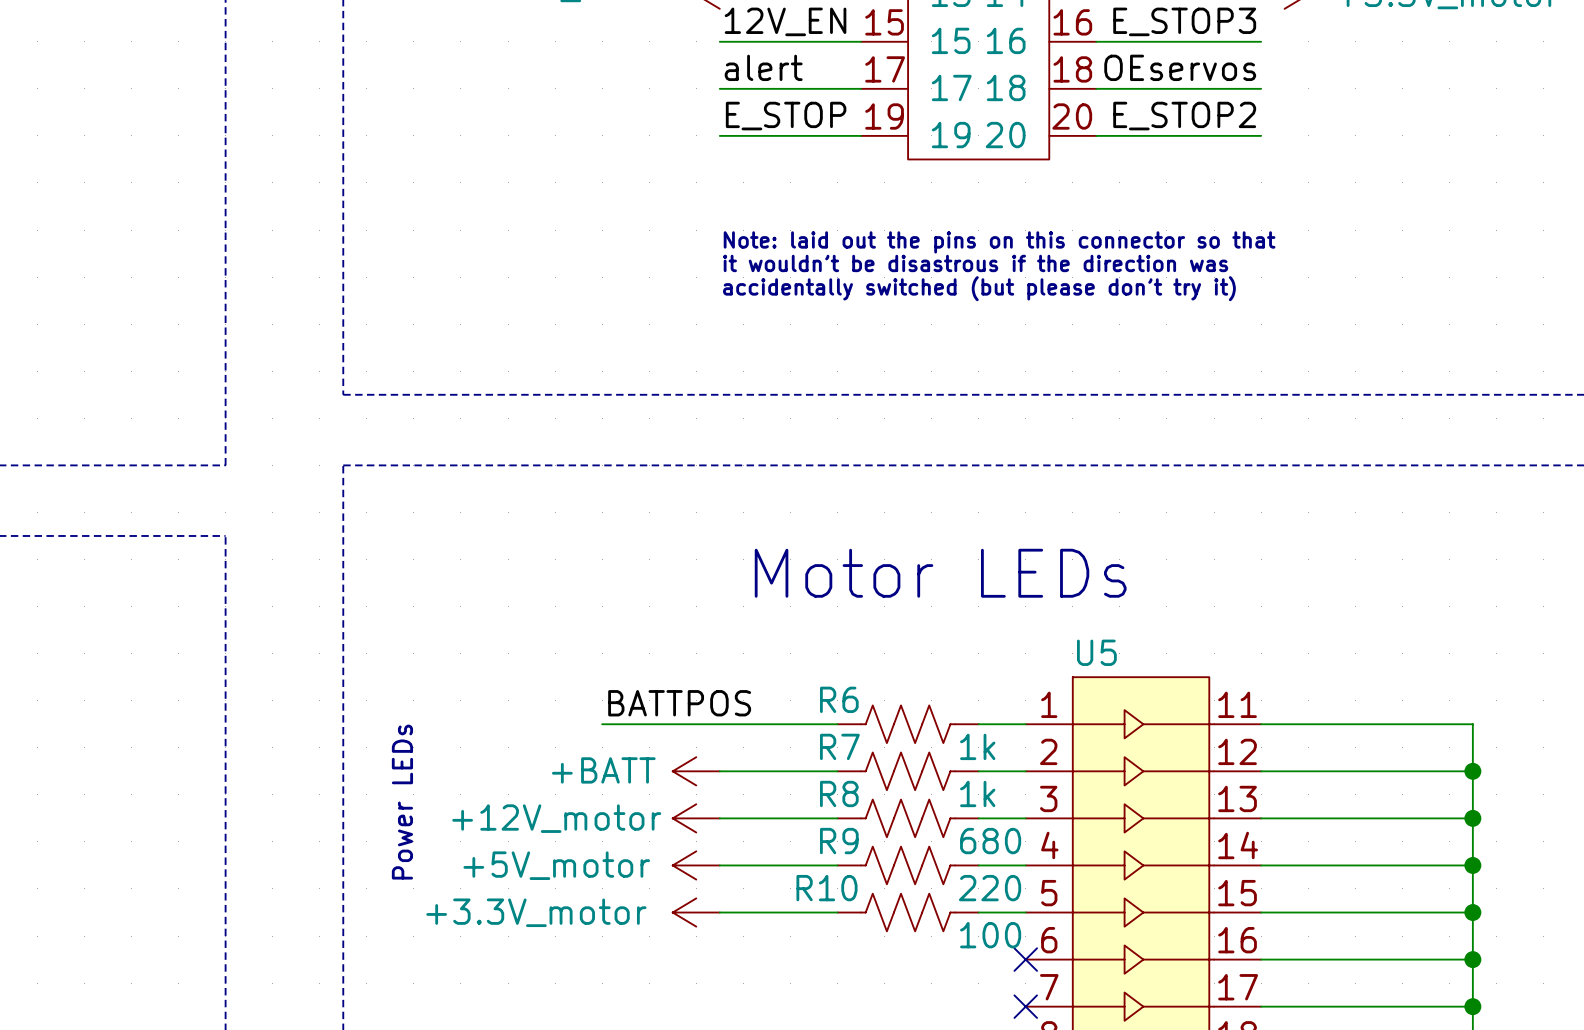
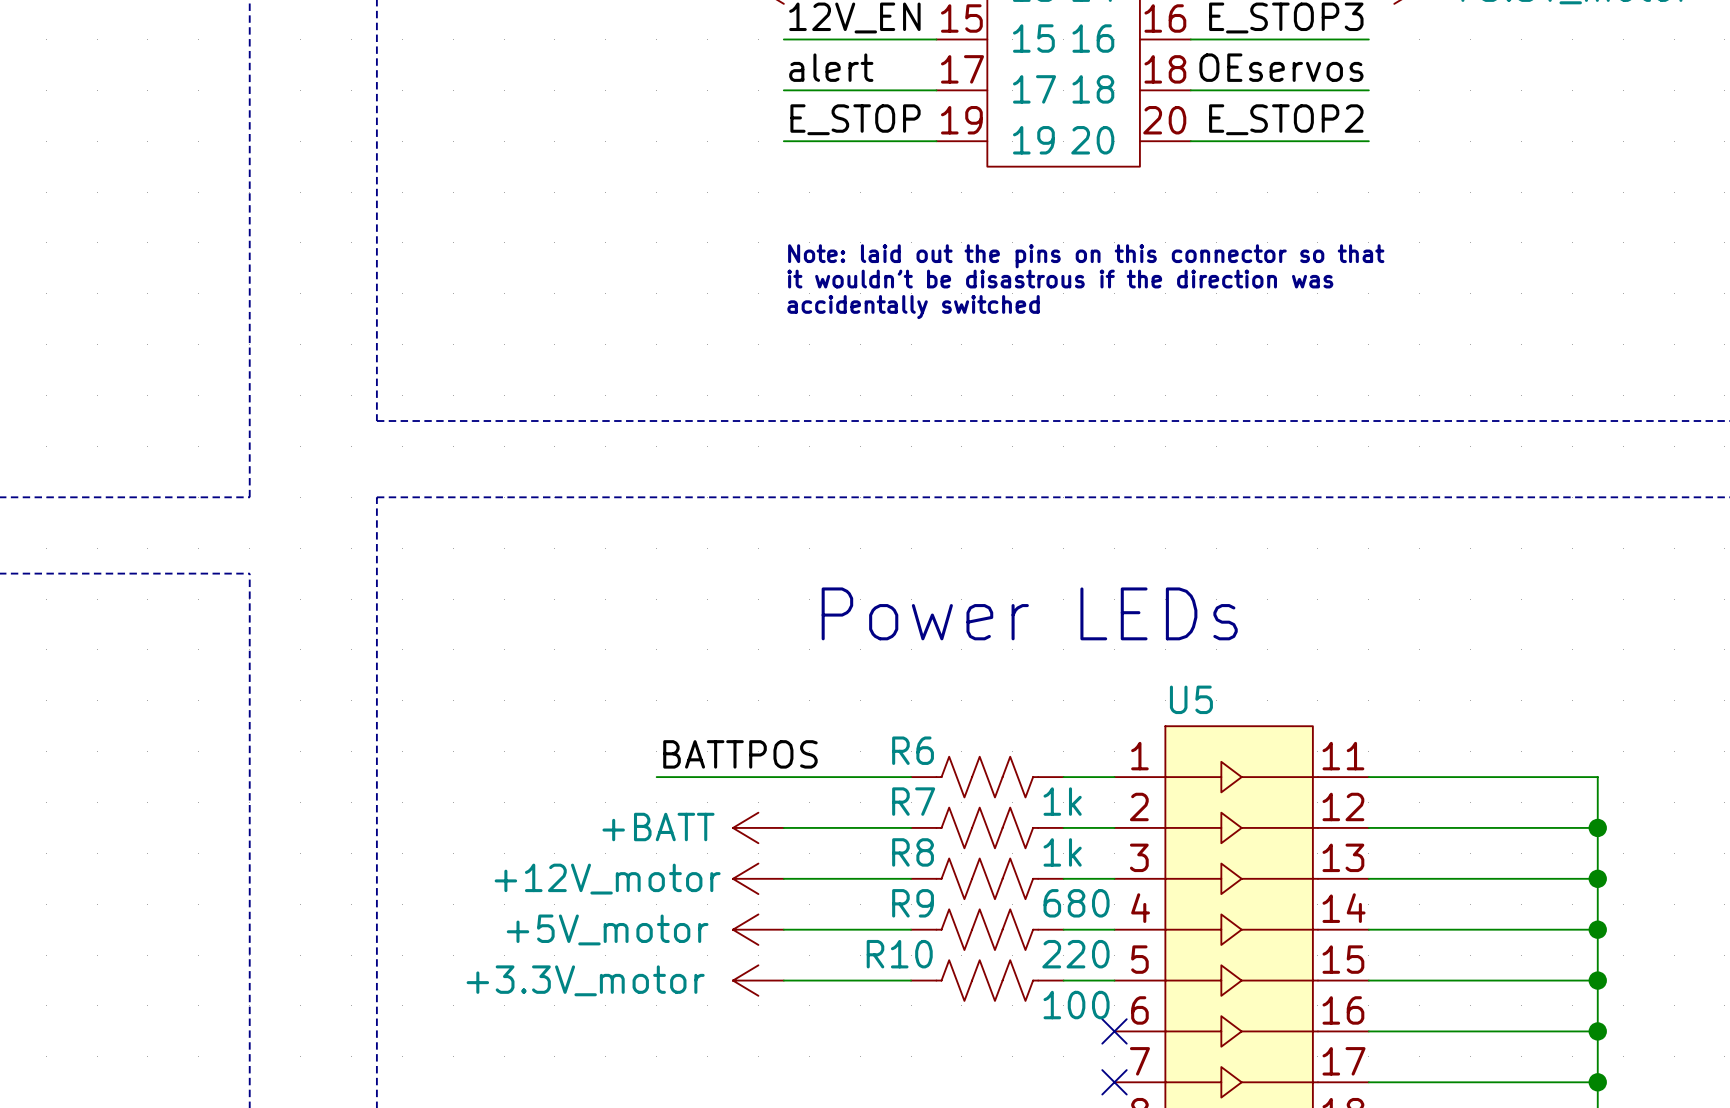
text: accidentally switched (but please don’t try it) (979, 288) -> accidentally switched (913, 307)
text: Motor LEDs (940, 573) -> Power LEDs (1029, 613)
text: Power LEDs (402, 802) -> none

